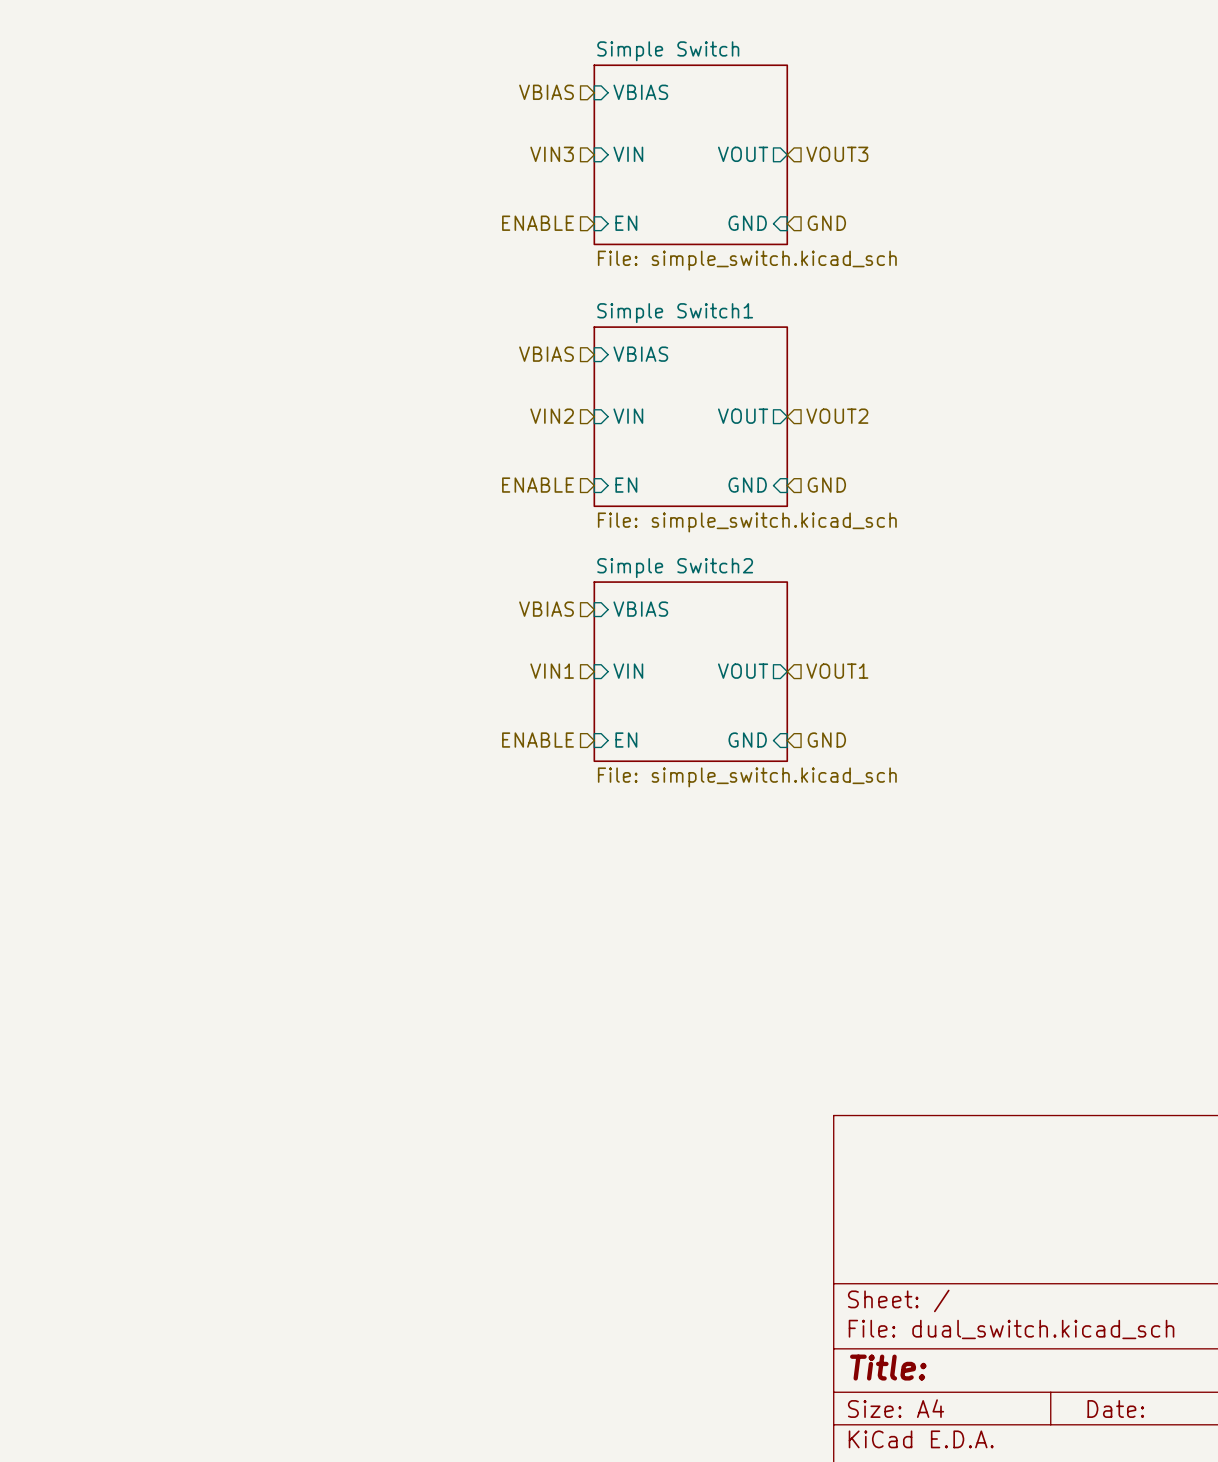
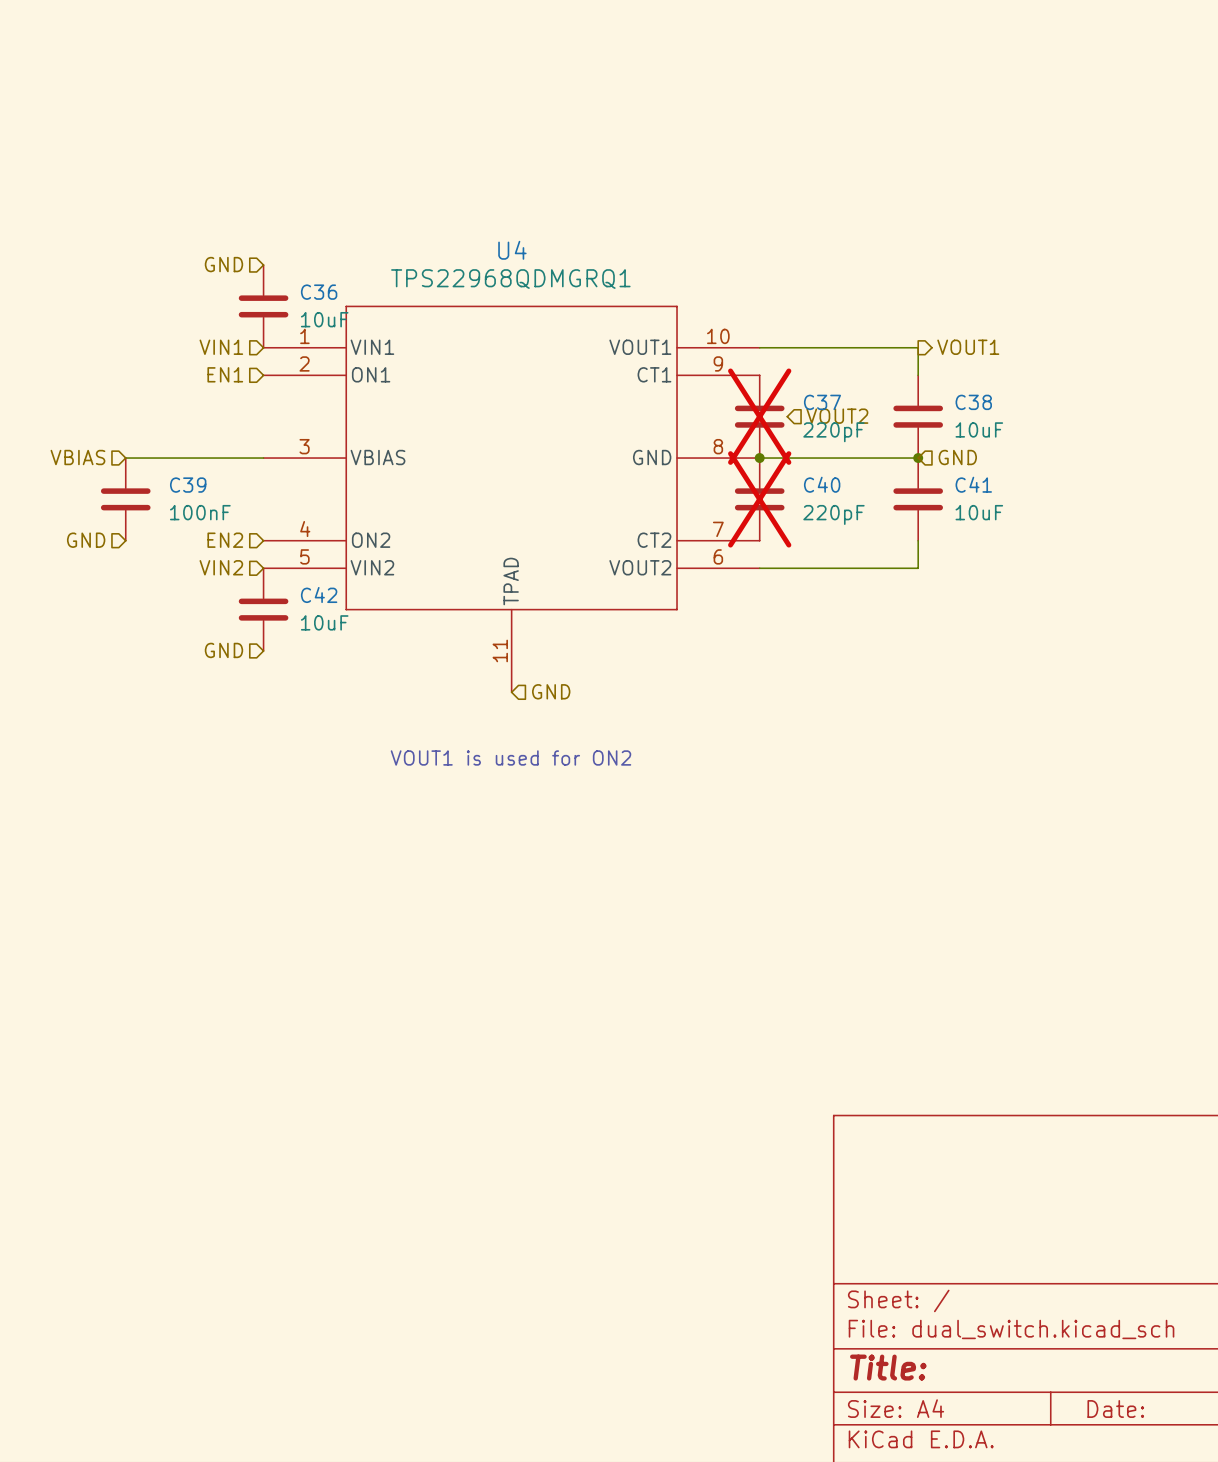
hierarchical label: VBIAS (546, 92) -> none
sheet pin: VBIAS (640, 92) -> none
hierarchical label: VIN3 (552, 154) -> none
sheet pin: VIN (628, 154) -> none
sheet Simple Switch: File: simple_switch.kicad_sch (690, 154) -> none
sheet pin: VOUT (743, 154) -> none
hierarchical label: VOUT3 (837, 154) -> none
hierarchical label: ENABLE (537, 223) -> none
sheet pin: EN (626, 223) -> none
sheet pin: GND (747, 223) -> none
hierarchical label: GND (826, 223) -> none
hierarchical label: none -> GND (223, 264)
C36: none -> 10uF (263, 306)
hierarchical label: none -> VIN1 (221, 347)
wire: none -> (759, 347) (918, 347) (918, 375)
hierarchical label: none -> VOUT1 (968, 347)
hierarchical label: VBIAS (546, 354) -> none
sheet pin: VBIAS (640, 354) -> none
hierarchical label: none -> EN1 (225, 374)
hierarchical label: VIN2 (552, 416) -> none
sheet pin: VIN (628, 416) -> none
sheet Simple Switch1: File: simple_switch.kicad_sch (690, 416) -> none
sheet pin: VOUT (743, 416) -> none
C37: none -> 220pF (759, 416)
C38: none -> 10uF (918, 416)
hierarchical label: none -> VBIAS (77, 457)
wire: none -> (125, 458) (263, 458)
wire: none -> (759, 458) (918, 458)
junction: none -> (759, 458)
junction: none -> (918, 458)
hierarchical label: ENABLE (537, 485) -> none
sheet pin: EN (626, 485) -> none
sheet pin: GND (747, 485) -> none
hierarchical label position: GND (826, 485) -> GND (957, 457)
C39: none -> 100nF (125, 499)
U4: none -> TPS22968QDMGRQ1 (511, 499)
C40: none -> 220pF (759, 499)
C41: none -> 10uF (918, 499)
hierarchical label: none -> GND (86, 540)
hierarchical label: none -> EN2 (225, 540)
wire: none -> (918, 540) (918, 568) (759, 568)
hierarchical label: none -> VIN2 (221, 567)
C42: none -> 10uF (263, 609)
hierarchical label: VBIAS (546, 609) -> none
sheet pin: VBIAS (640, 609) -> none
hierarchical label: none -> GND (223, 650)
hierarchical label: VIN1 (552, 671) -> none
sheet pin: VIN (628, 671) -> none
sheet Simple Switch2: File: simple_switch.kicad_sch (690, 671) -> none
sheet pin: VOUT (743, 671) -> none
hierarchical label: VOUT1 (837, 671) -> none
hierarchical label: none -> GND (551, 691)
hierarchical label: ENABLE (537, 740) -> none
sheet pin: EN (626, 740) -> none
sheet pin: GND (747, 740) -> none
hierarchical label: GND (826, 740) -> none
text: none -> VOUT1 is used for ON2 (510, 757)

